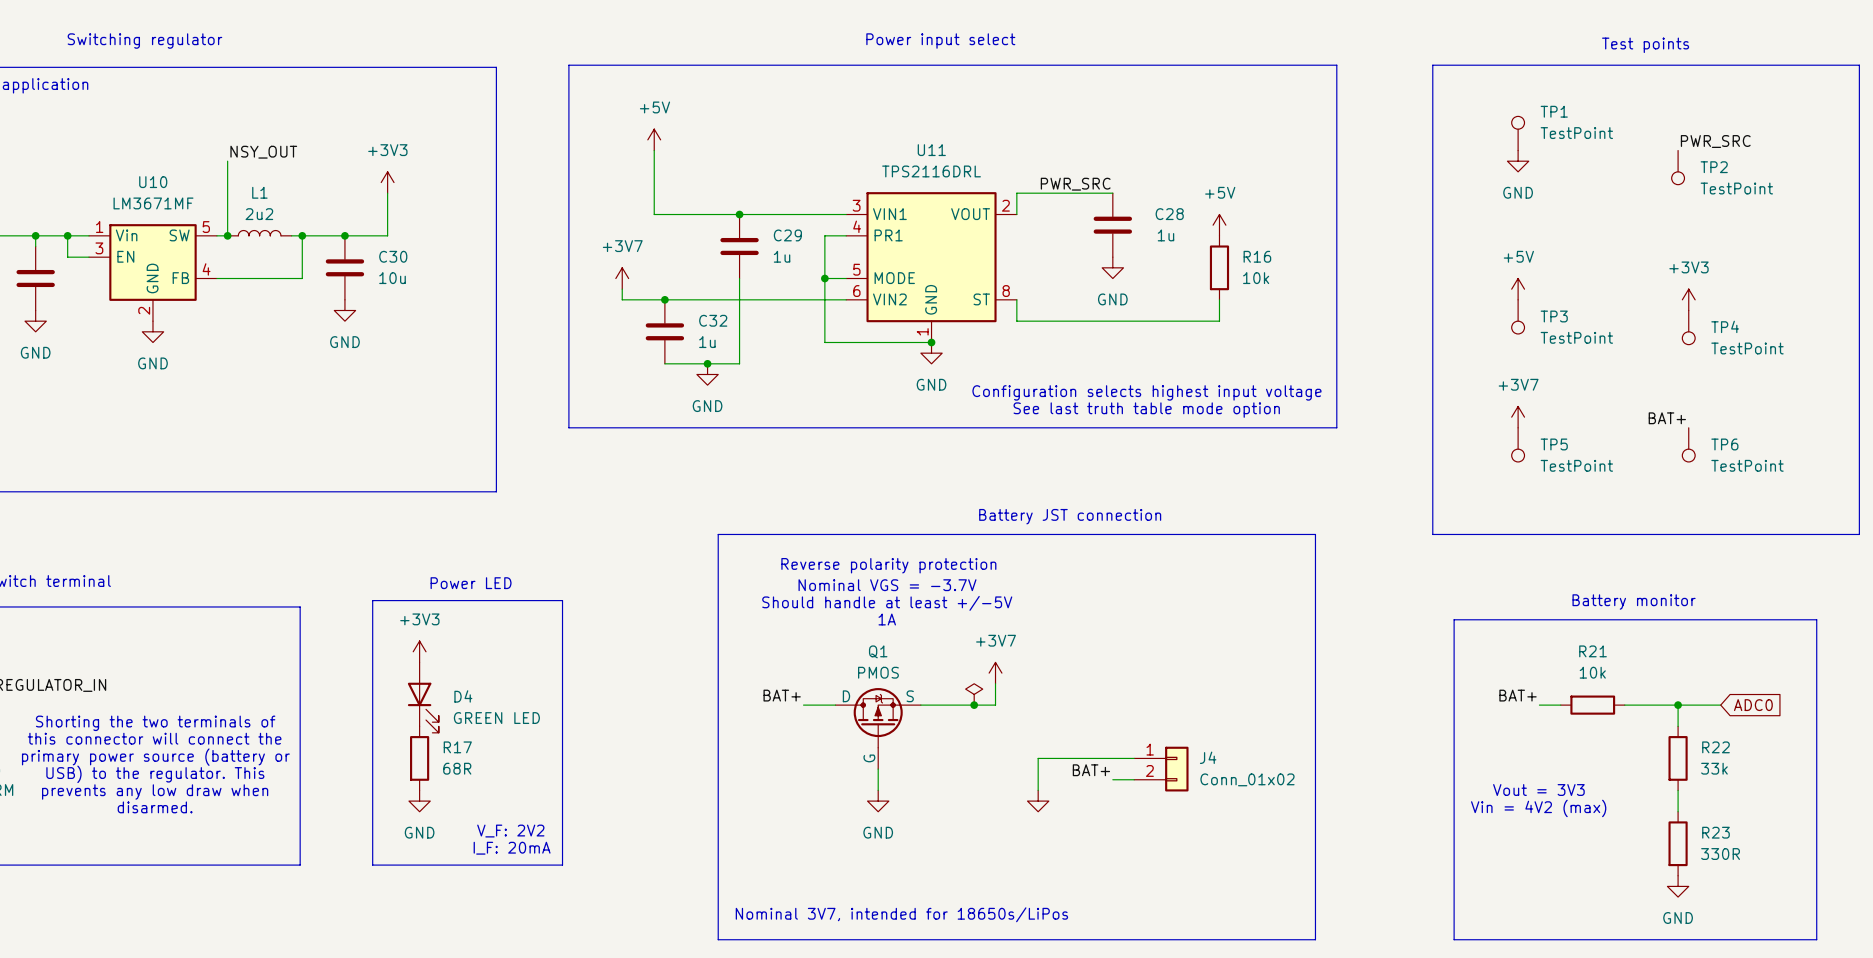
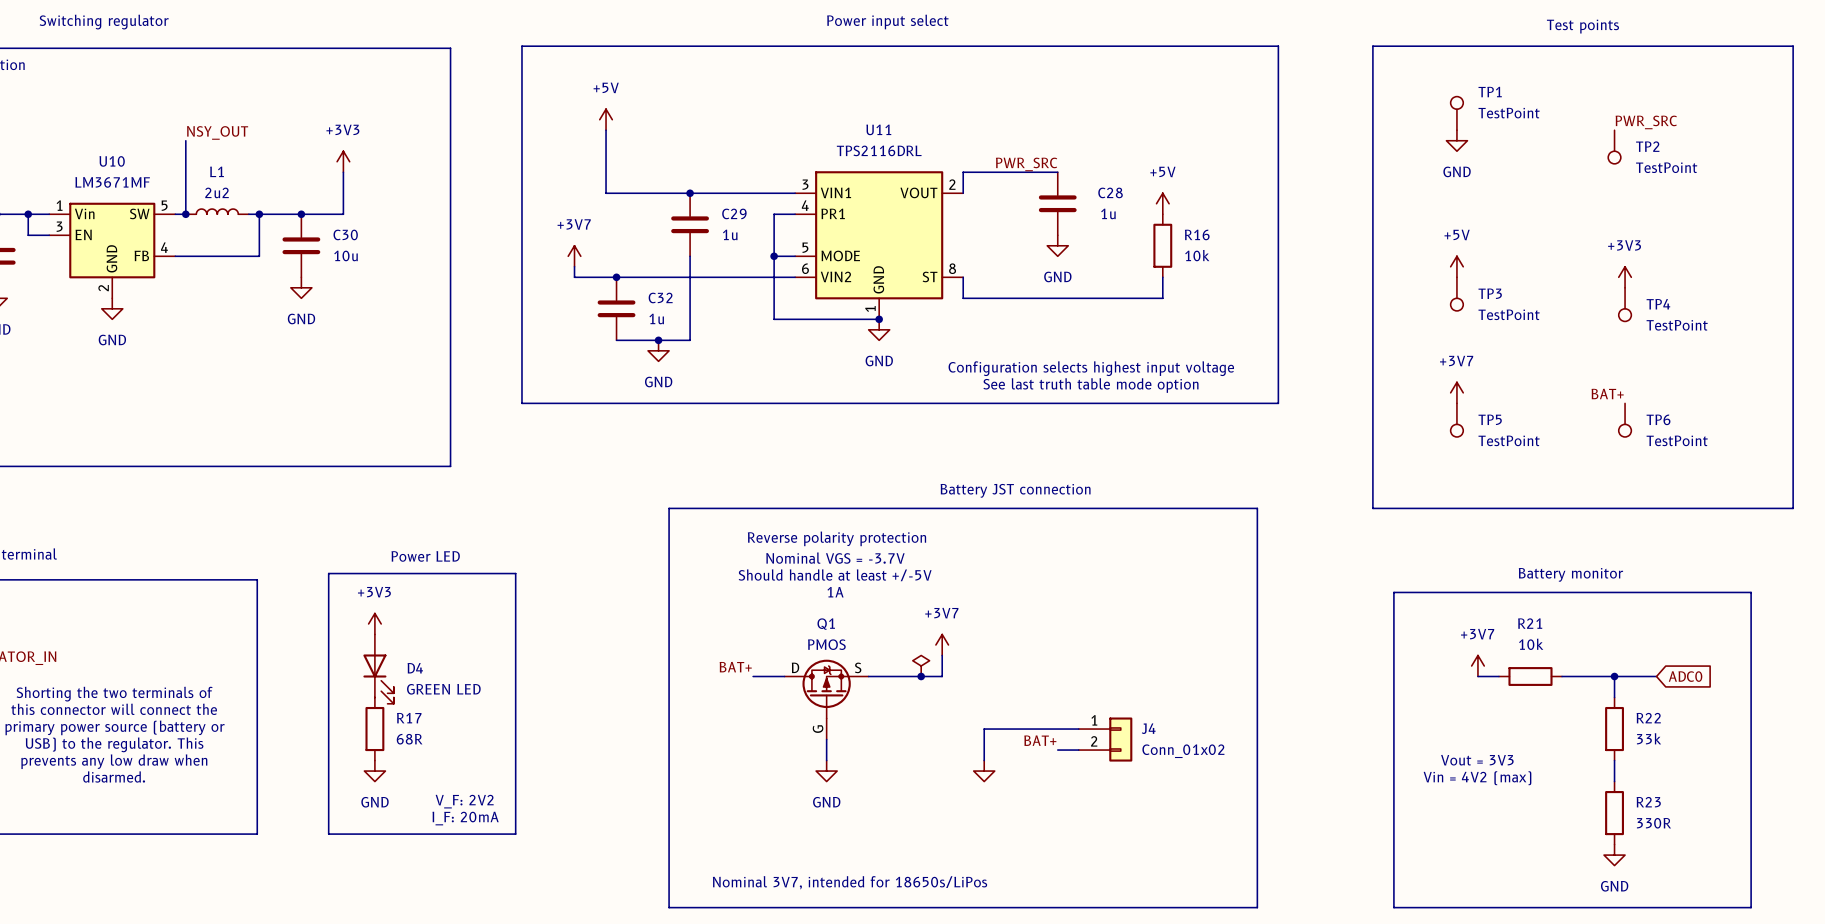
power symbol: none -> +3V7 (1477, 666)
label: BAT+ (1518, 695) -> none

